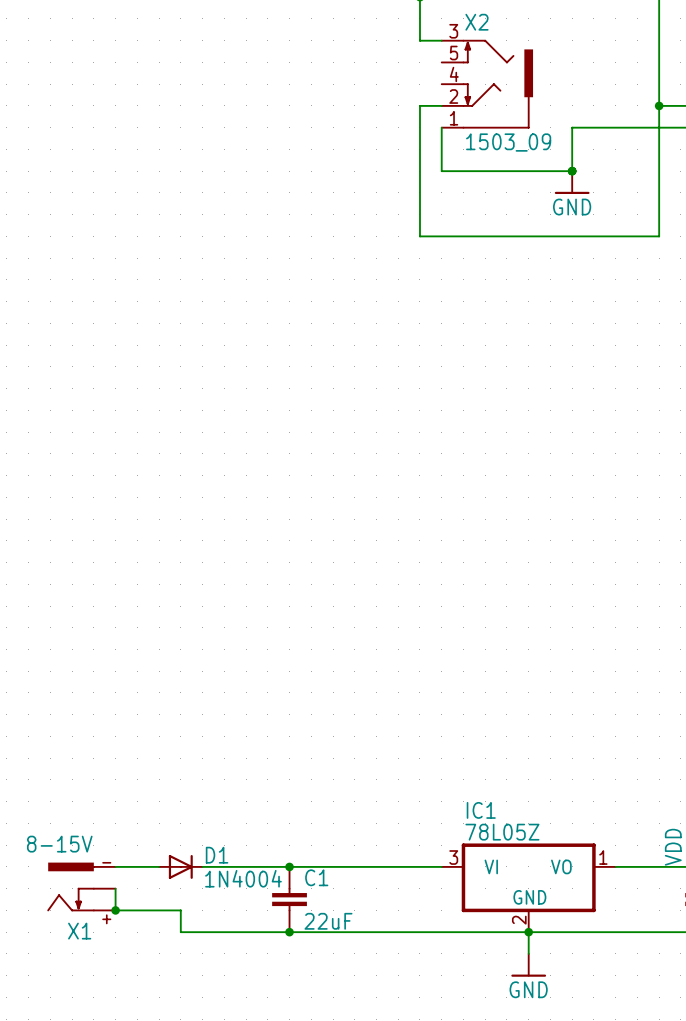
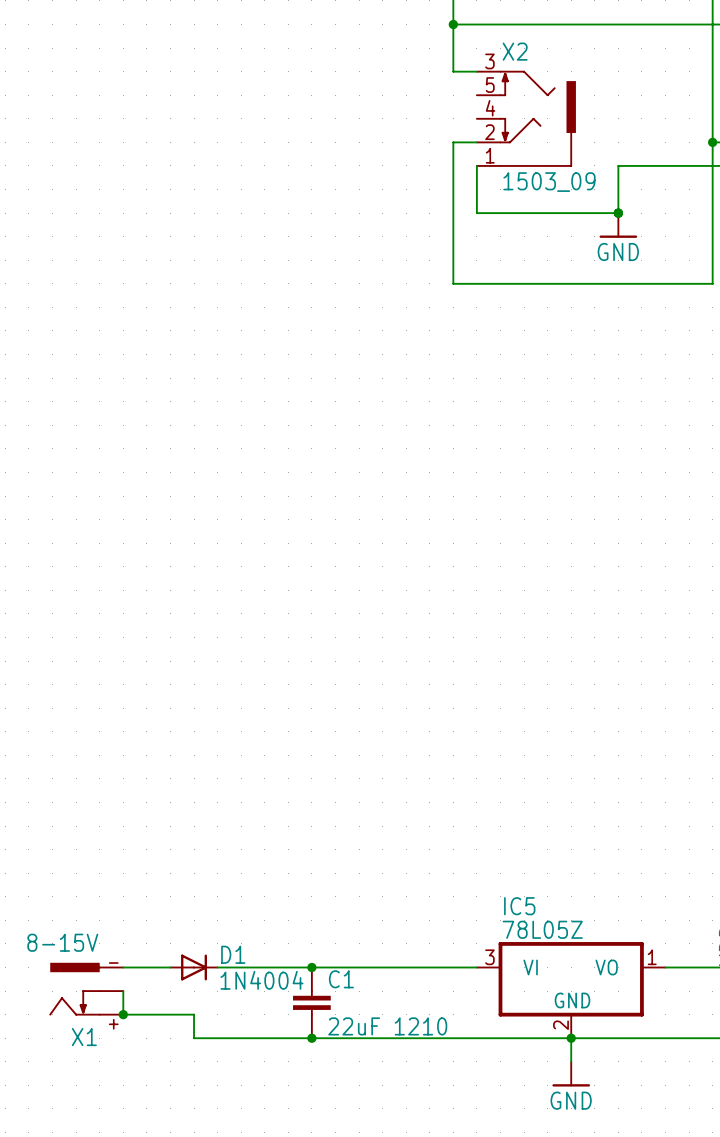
IC1 name: IC1 (481, 810) -> IC5 (519, 906)
C1 value: 22uF (328, 921) -> 22uF 1210 (387, 1026)

